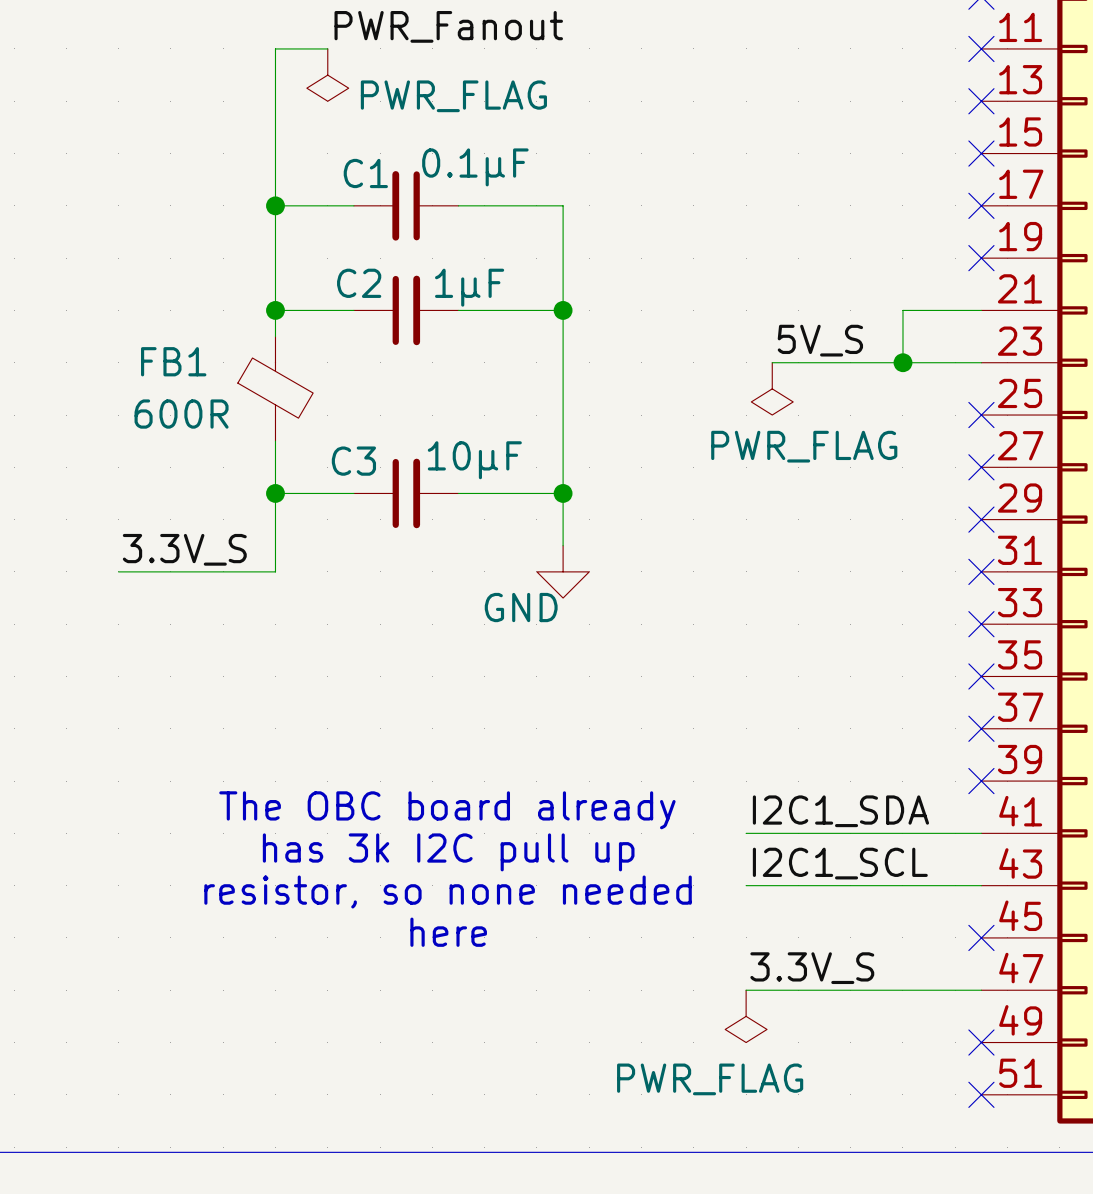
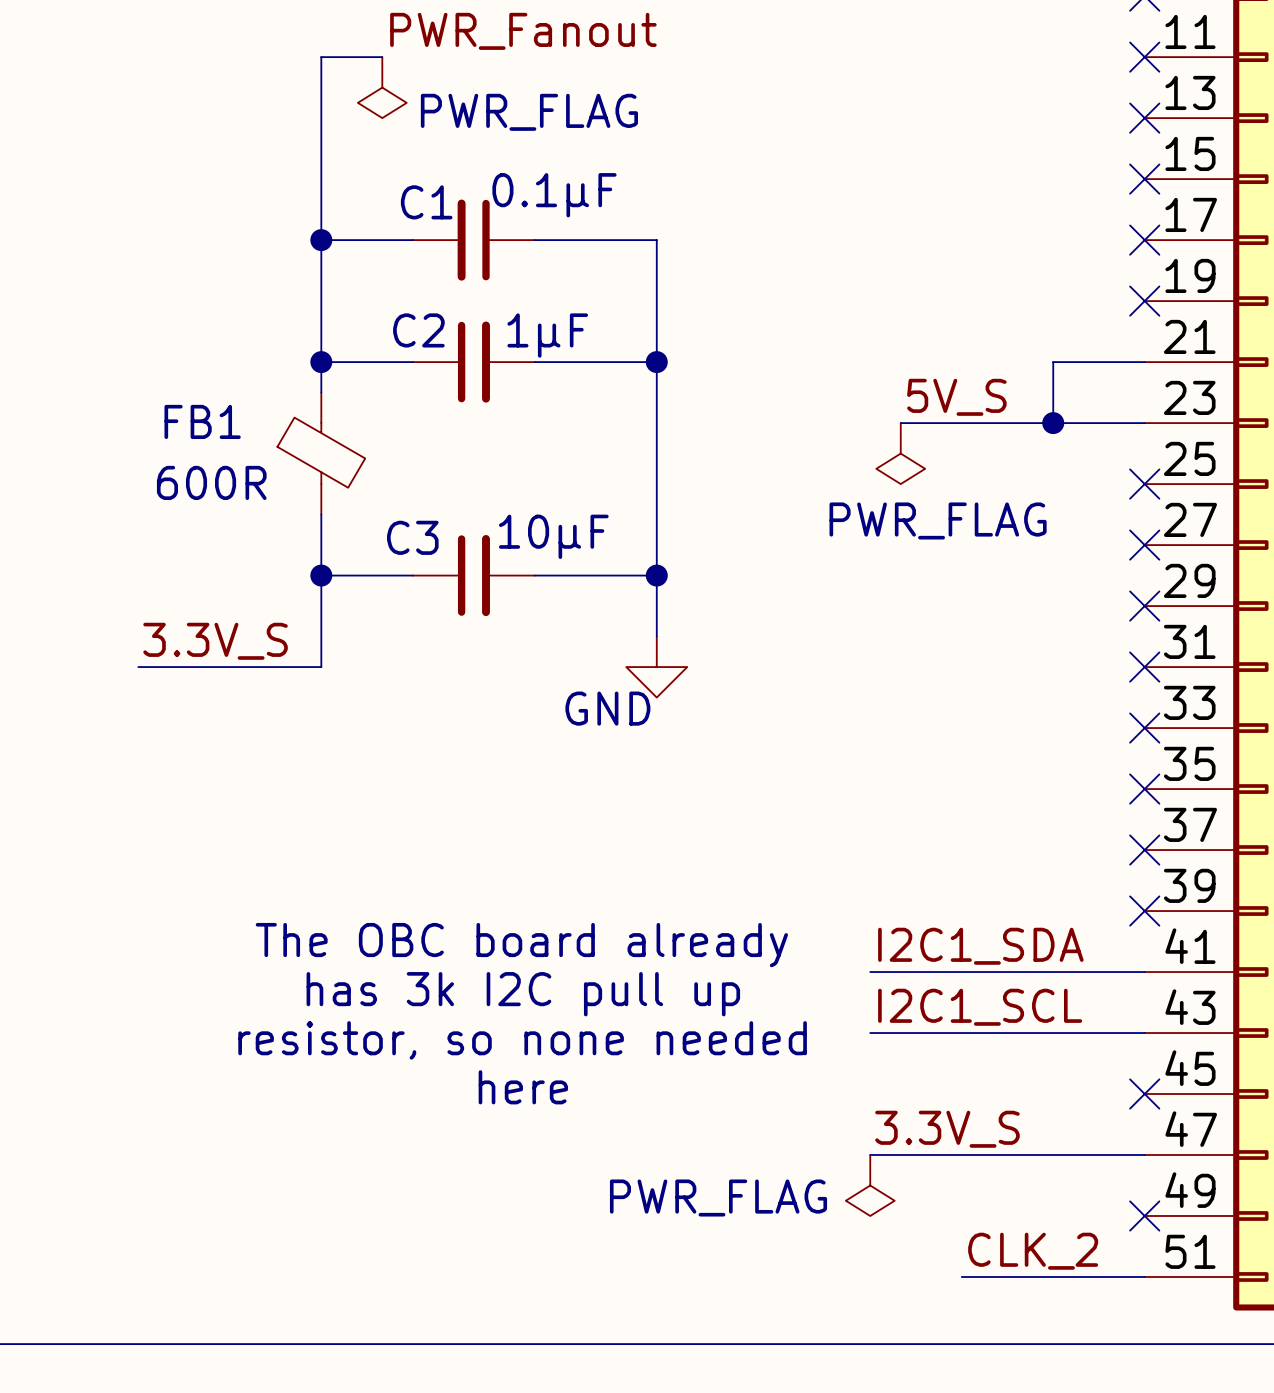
label: none -> CLK_2 (1033, 1251)
power symbol text position: PWR_FLAG (710, 1079) -> PWR_FLAG (718, 1198)
wire: none -> (961, 1276) (1144, 1276)
no-connect mark: (981, 1094) -> none

